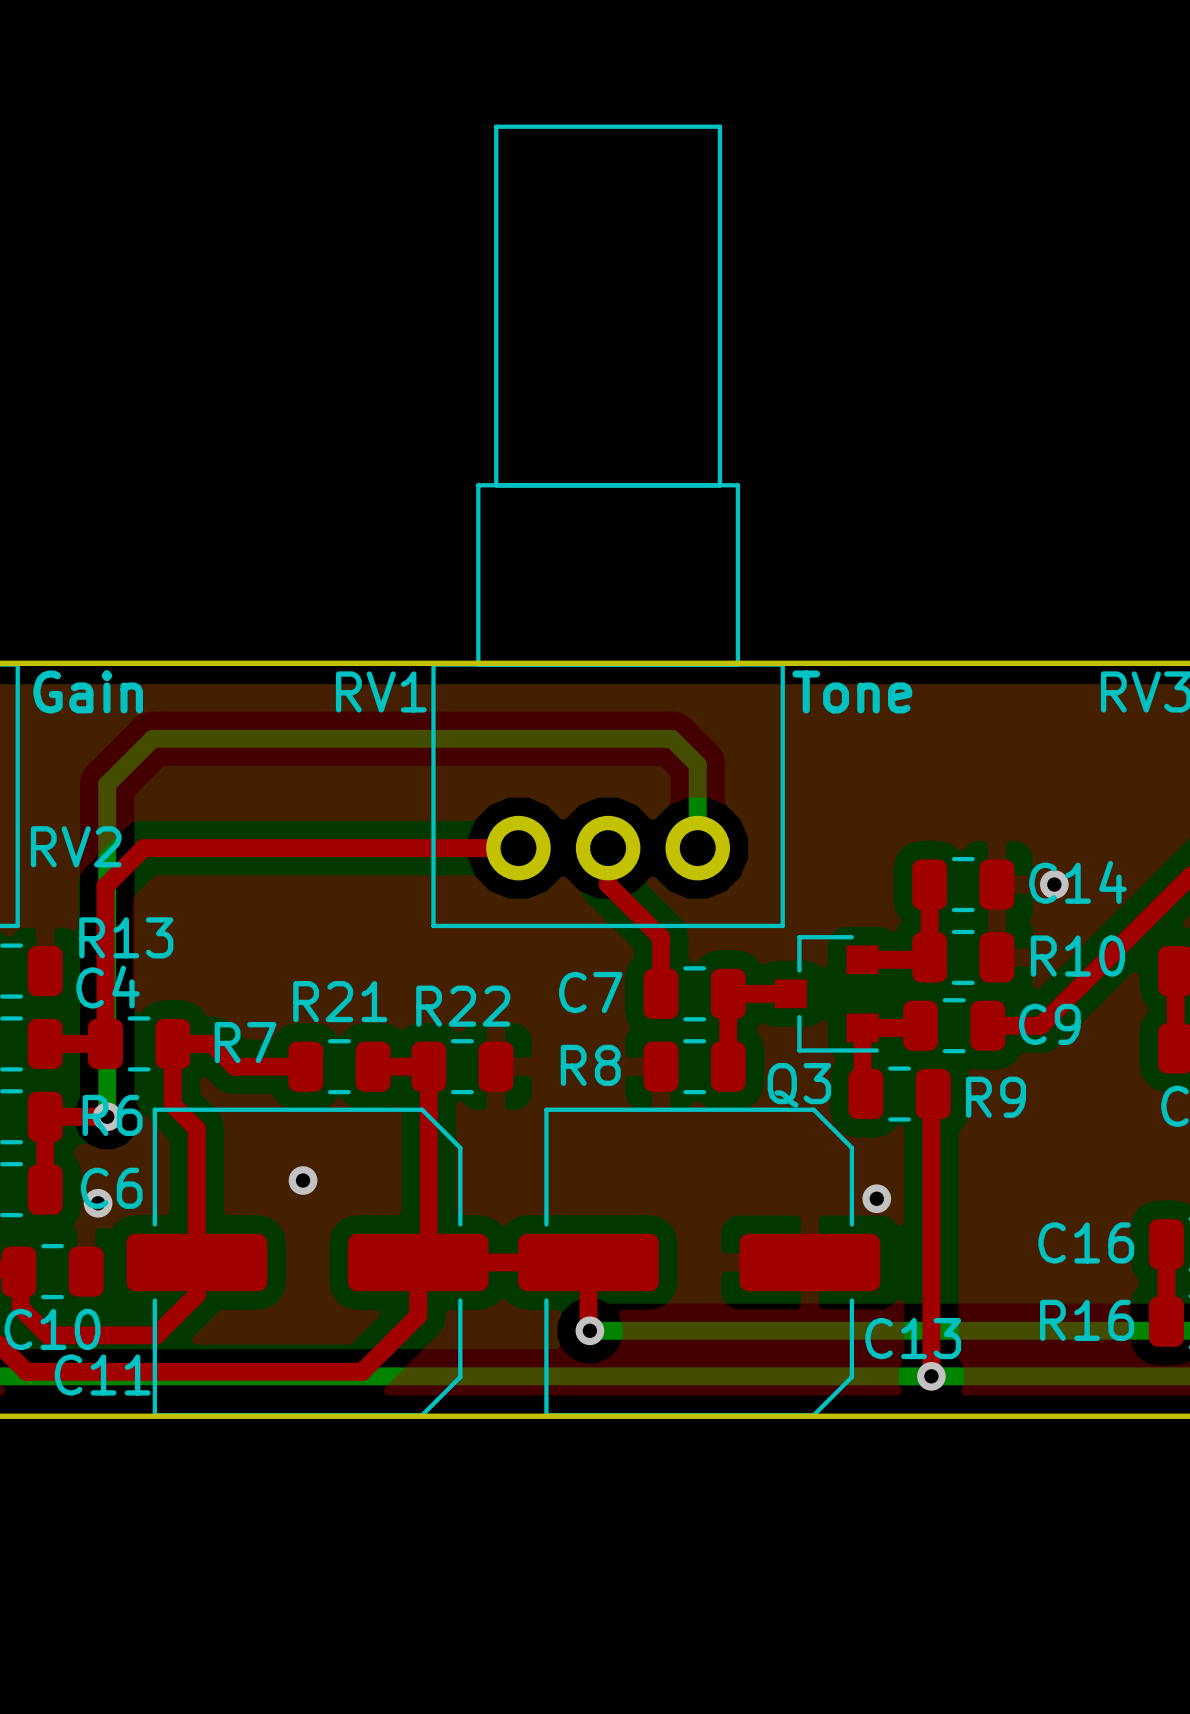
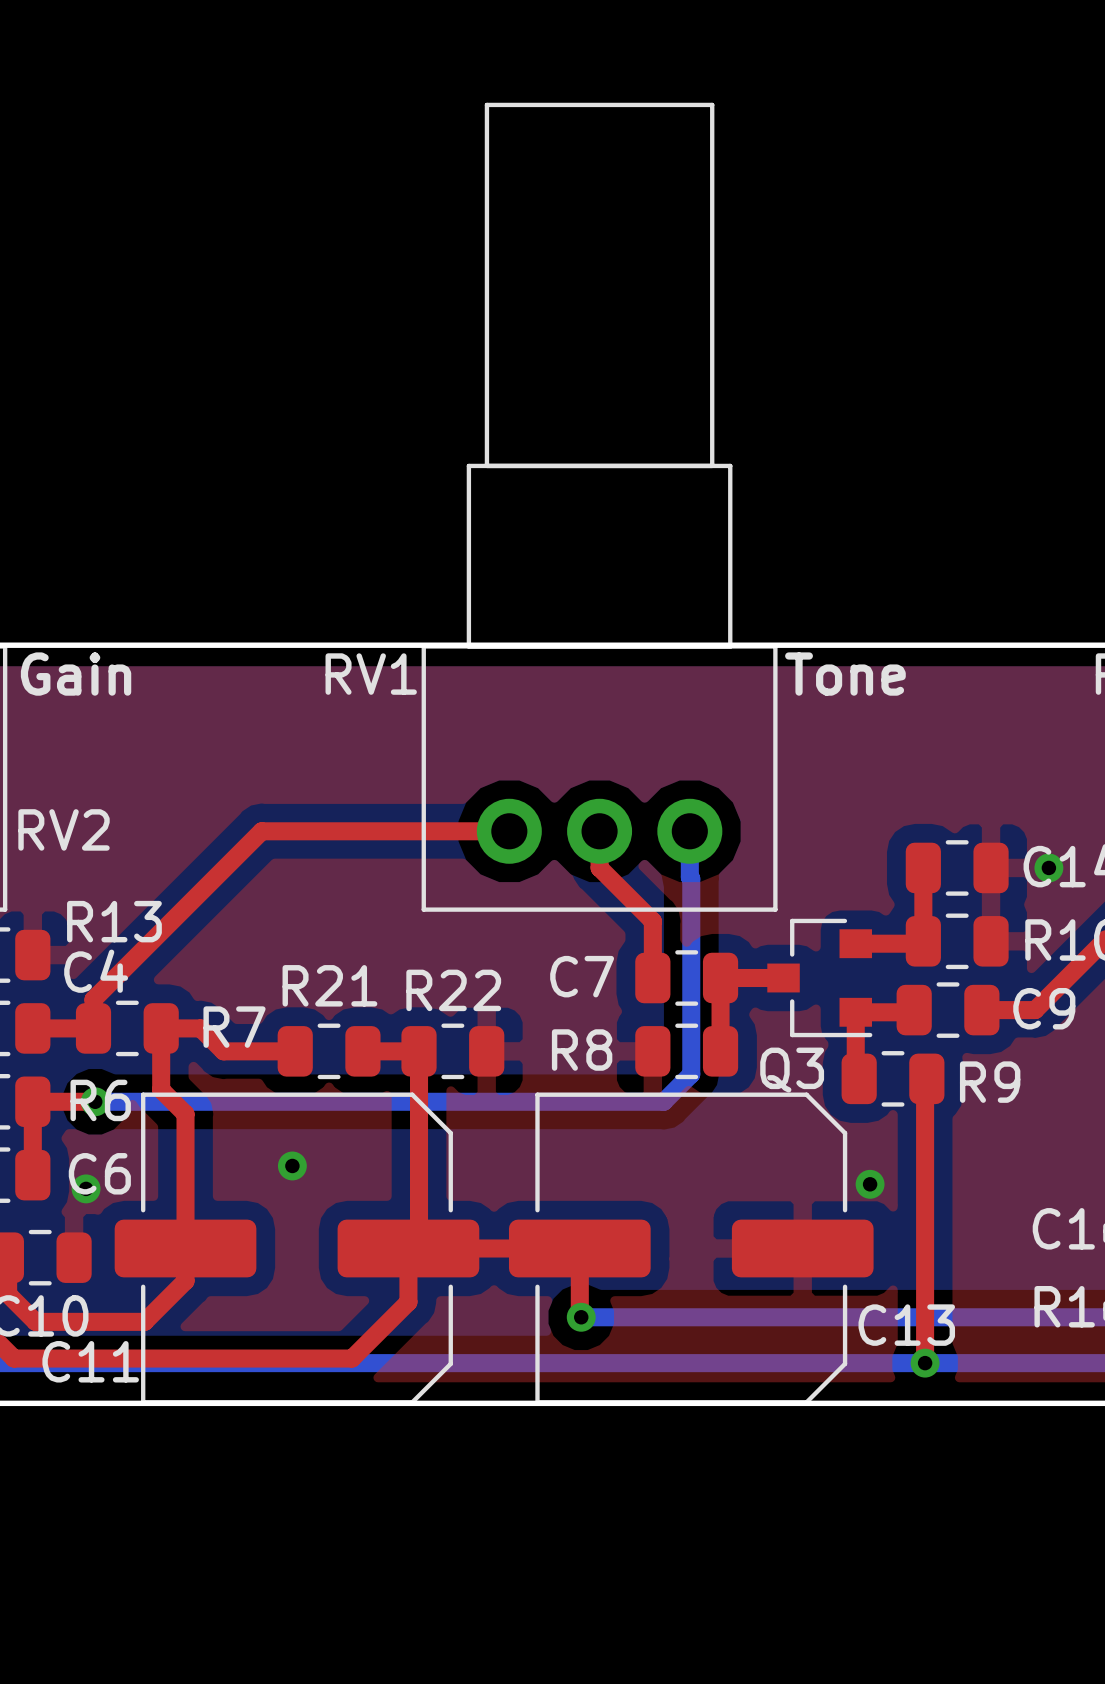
top track: (272, 848) (143, 848) (105, 886) (105, 1015) -> (261, 831) (93, 999)
bottom track: (697, 848) (697, 764) (671, 738) (152, 738) (107, 784) (107, 1116) -> (689, 831) (691, 1074) (663, 1101) (95, 1101)

